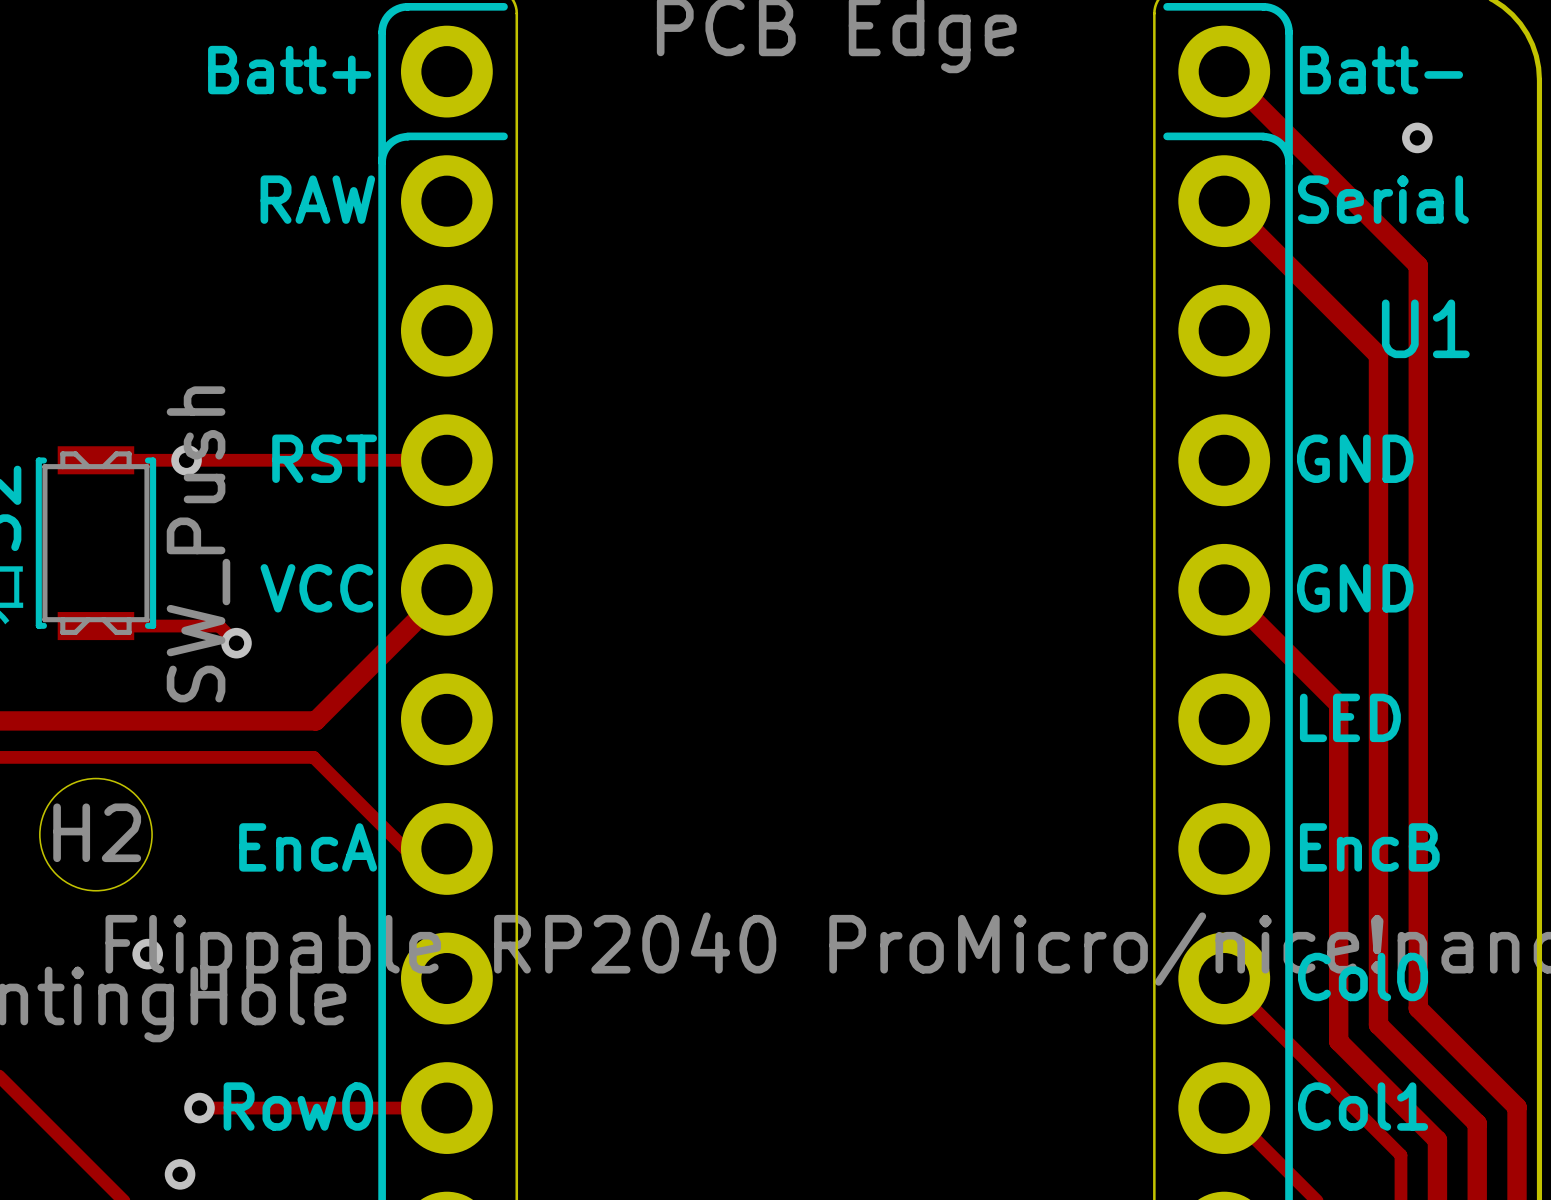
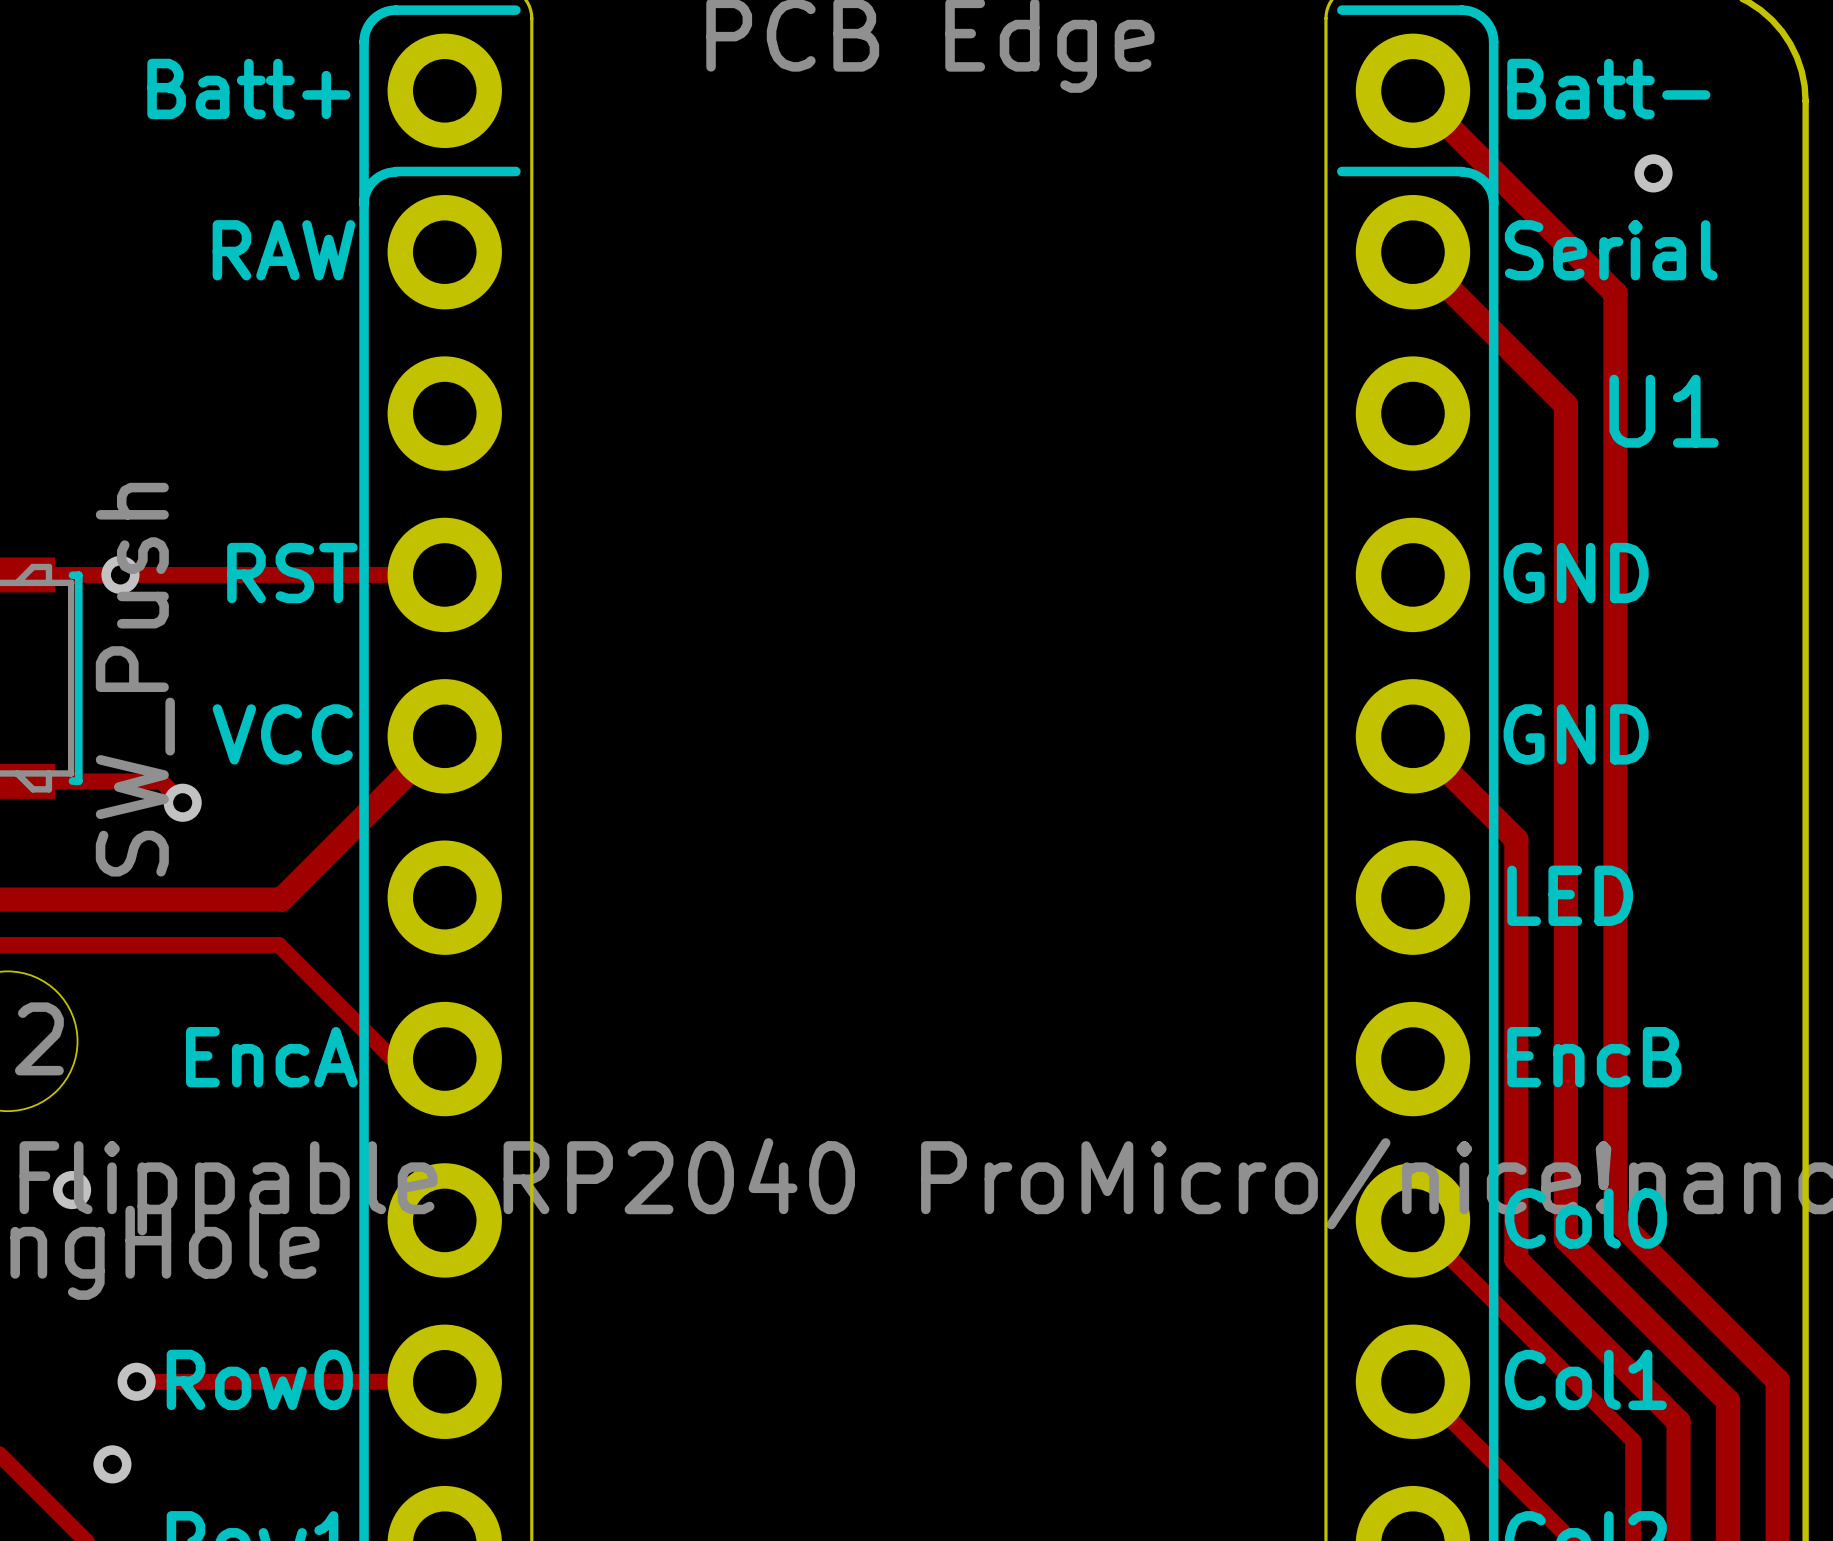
track: (1386, 234) (1418, 265) (1418, 1008) -> (1615, 293) (1615, 1218) (1654, 1257)
track: (1347, 323) (1378, 355) (1378, 1024) -> (1565, 405) (1565, 1239) (1605, 1278)
track: (1307, 672) (1338, 704) (1338, 1041) -> (1516, 839) (1516, 1259) (1555, 1298)

